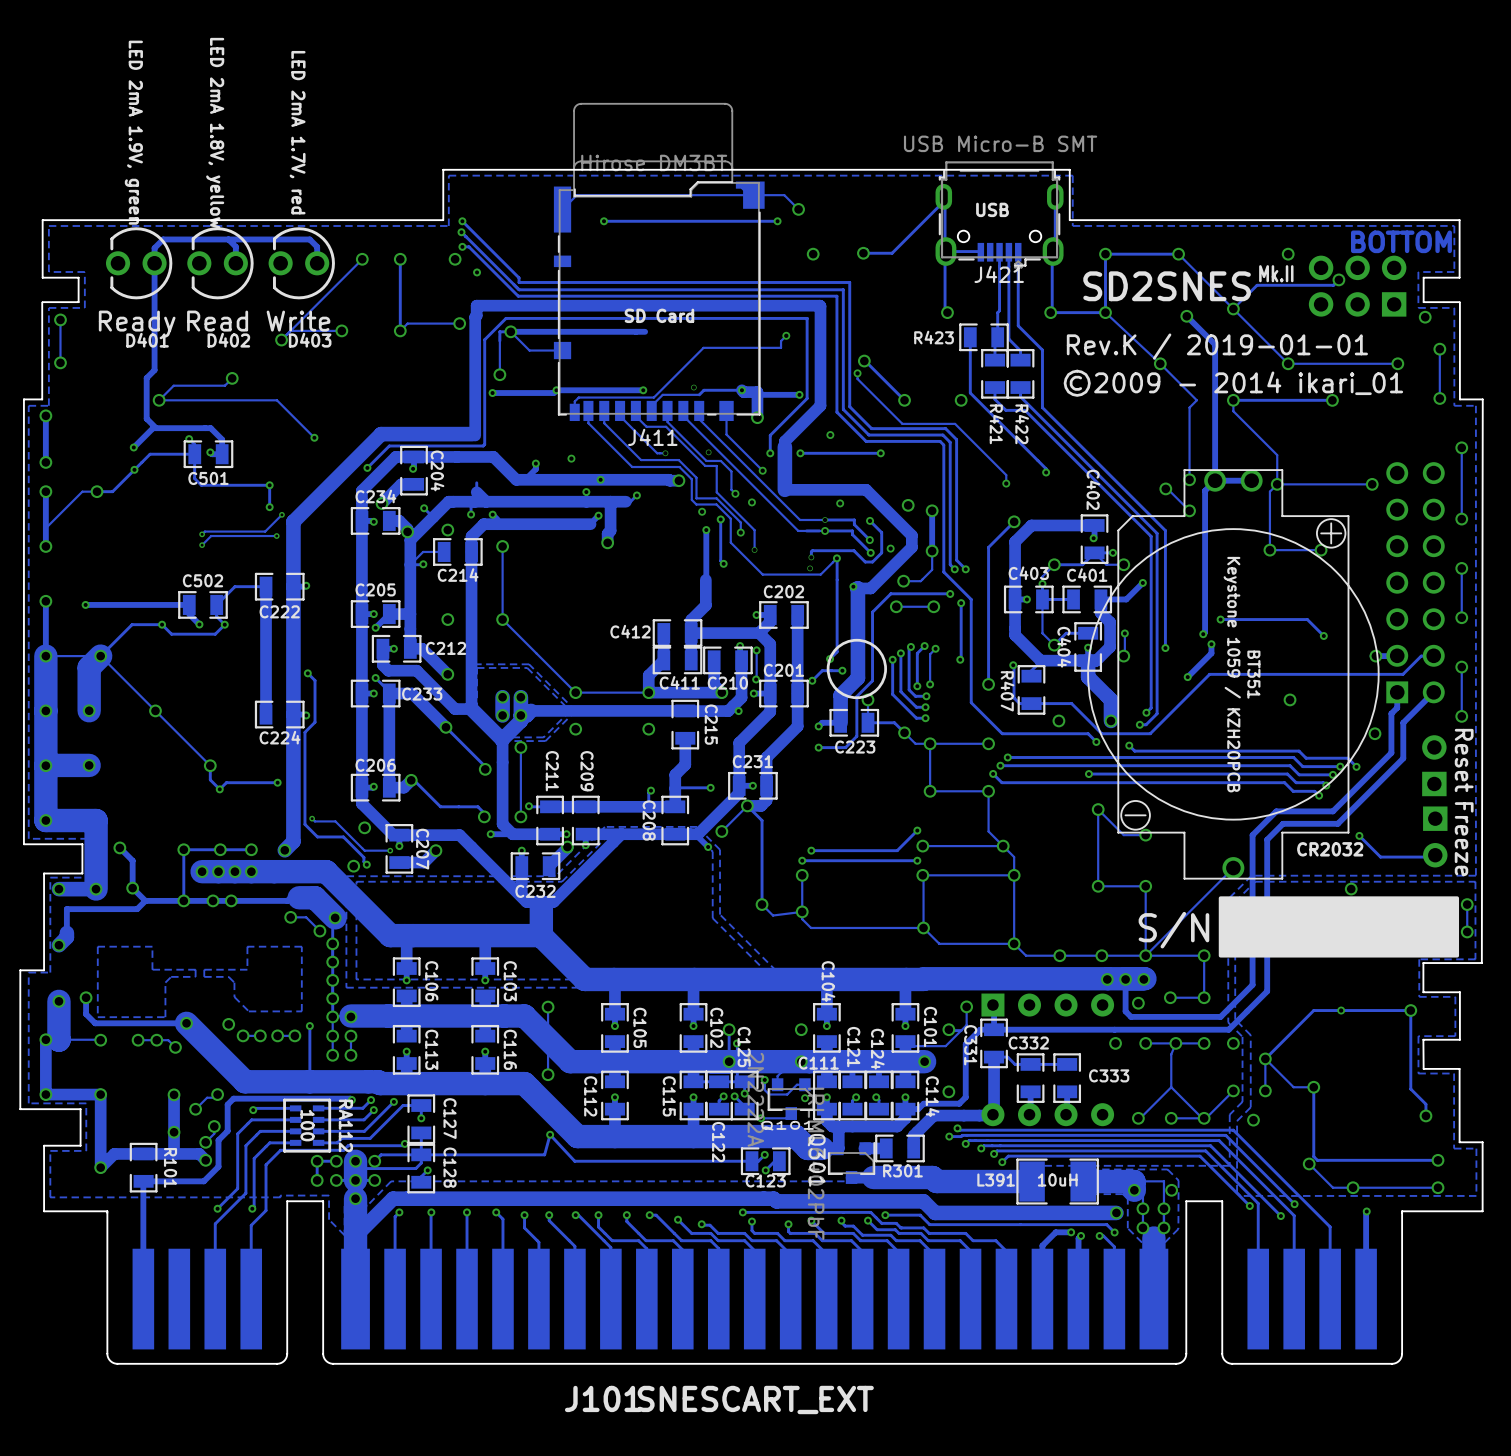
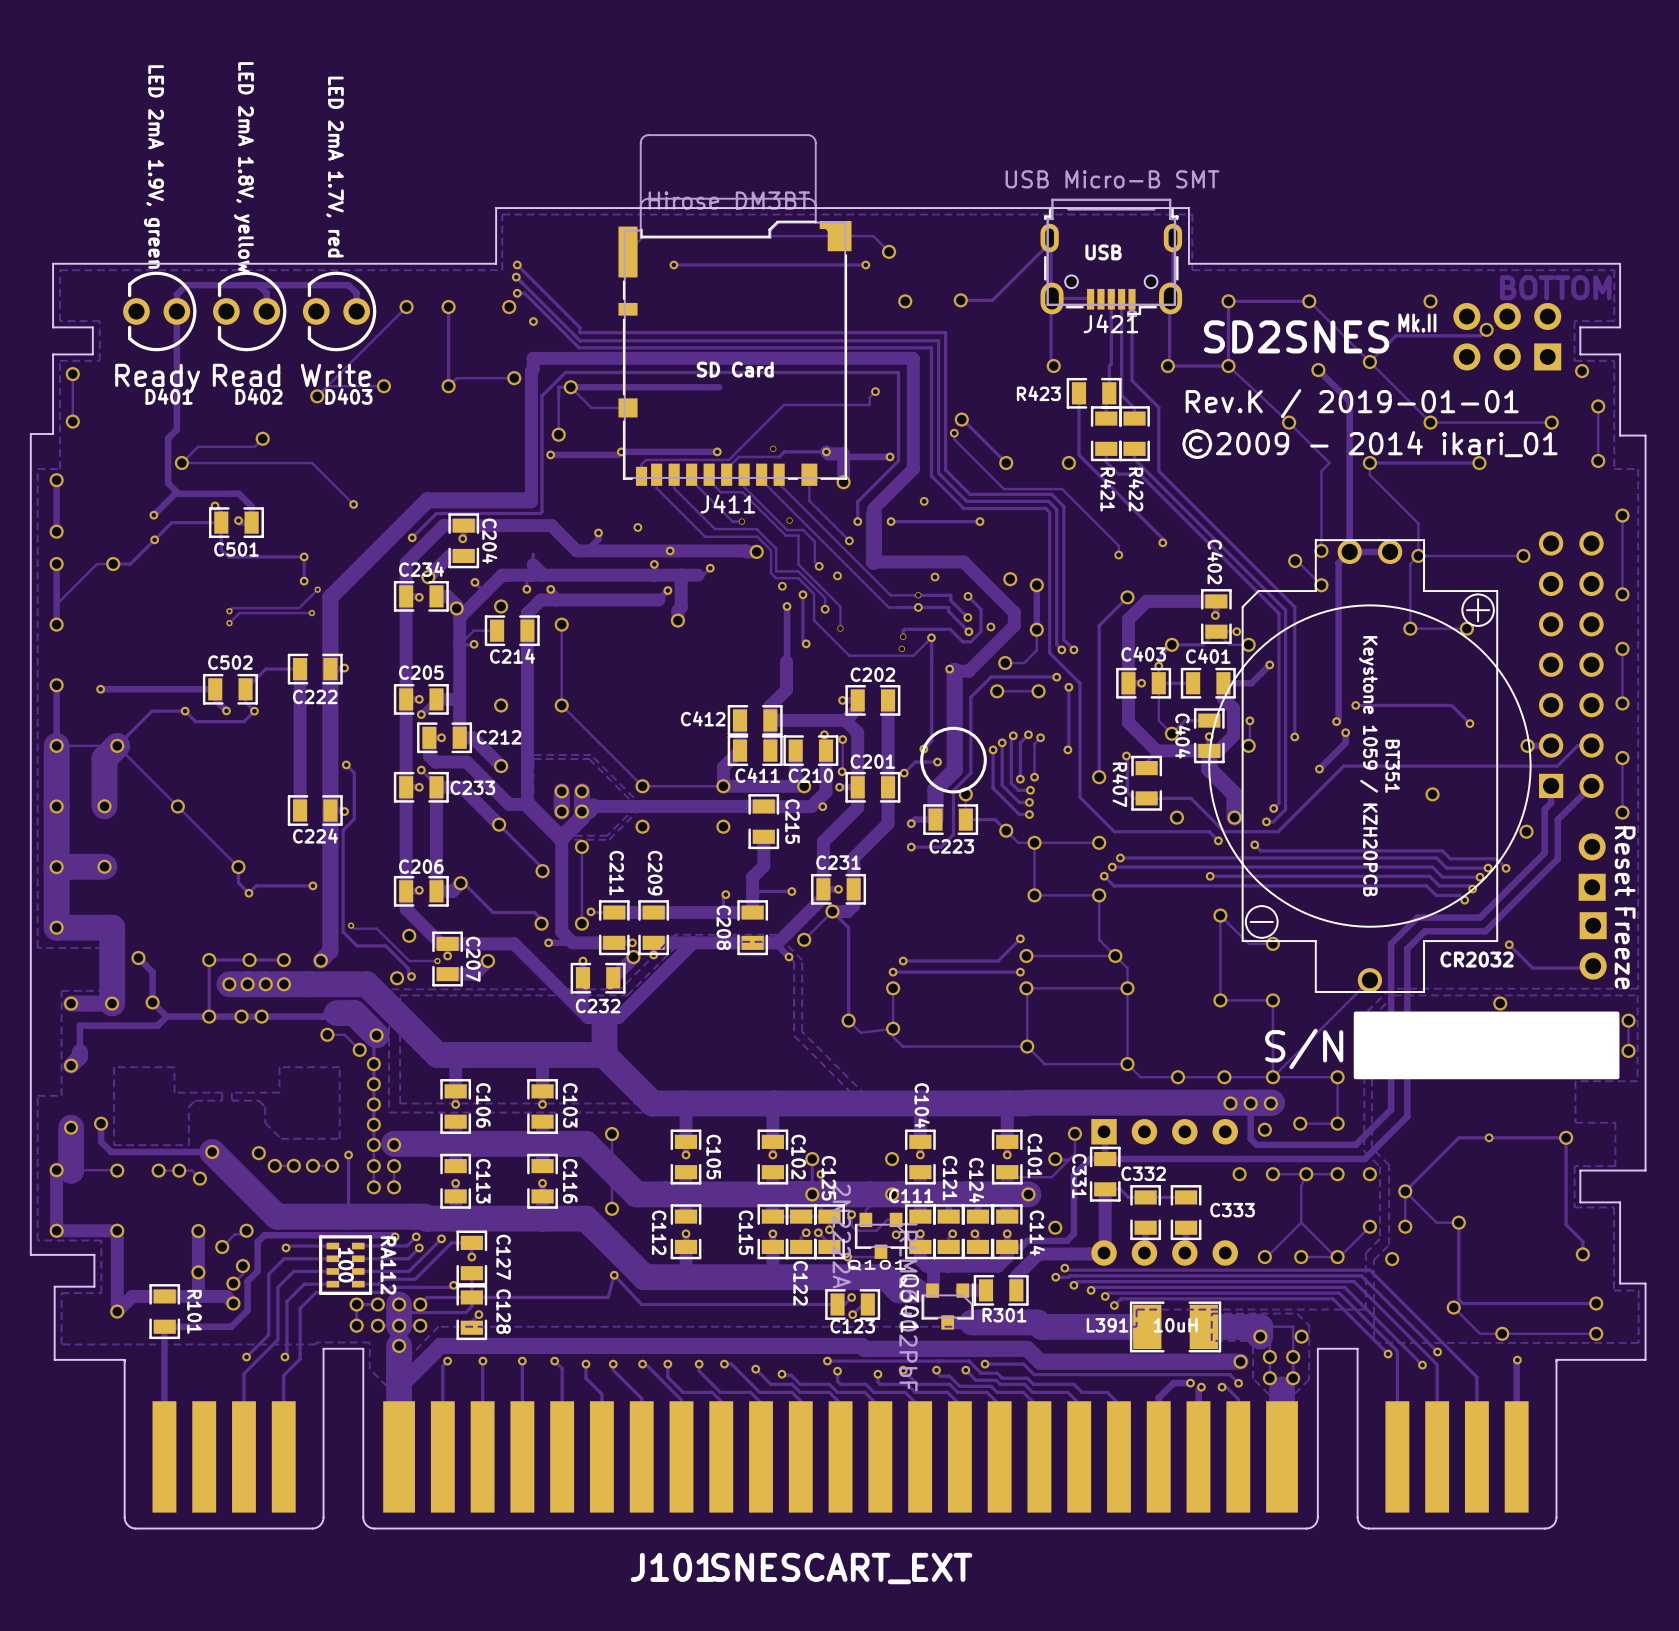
J101 footprint: [19, 169, 1484, 1365] -> [30, 207, 1647, 1530]

